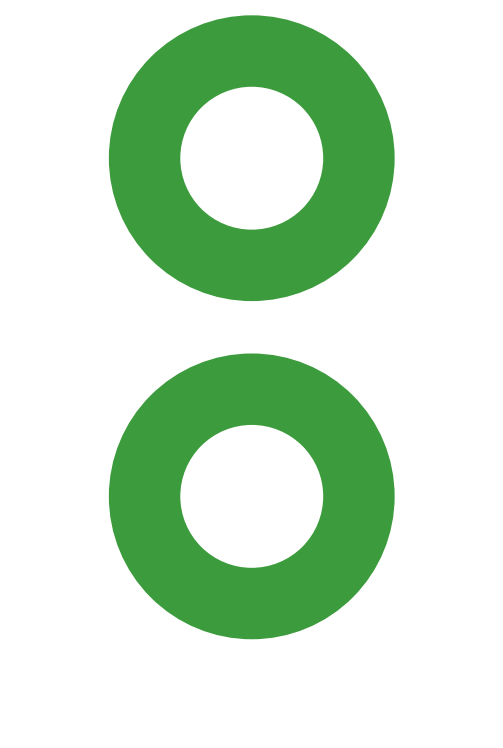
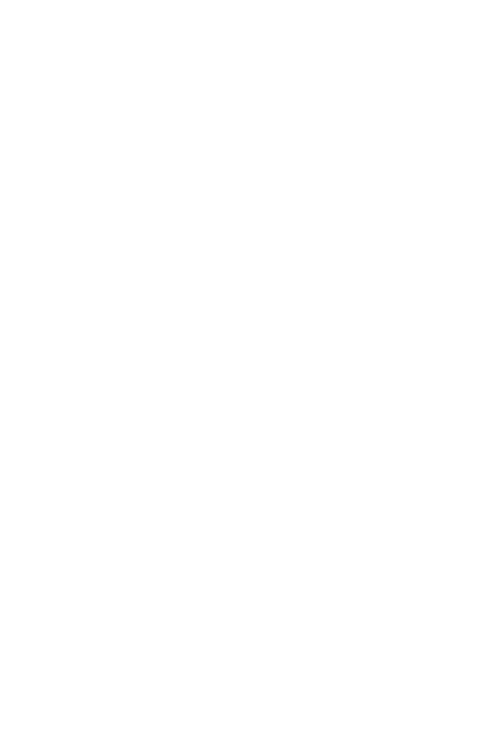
part: (251, 158) -> none
part: (251, 496) -> none

